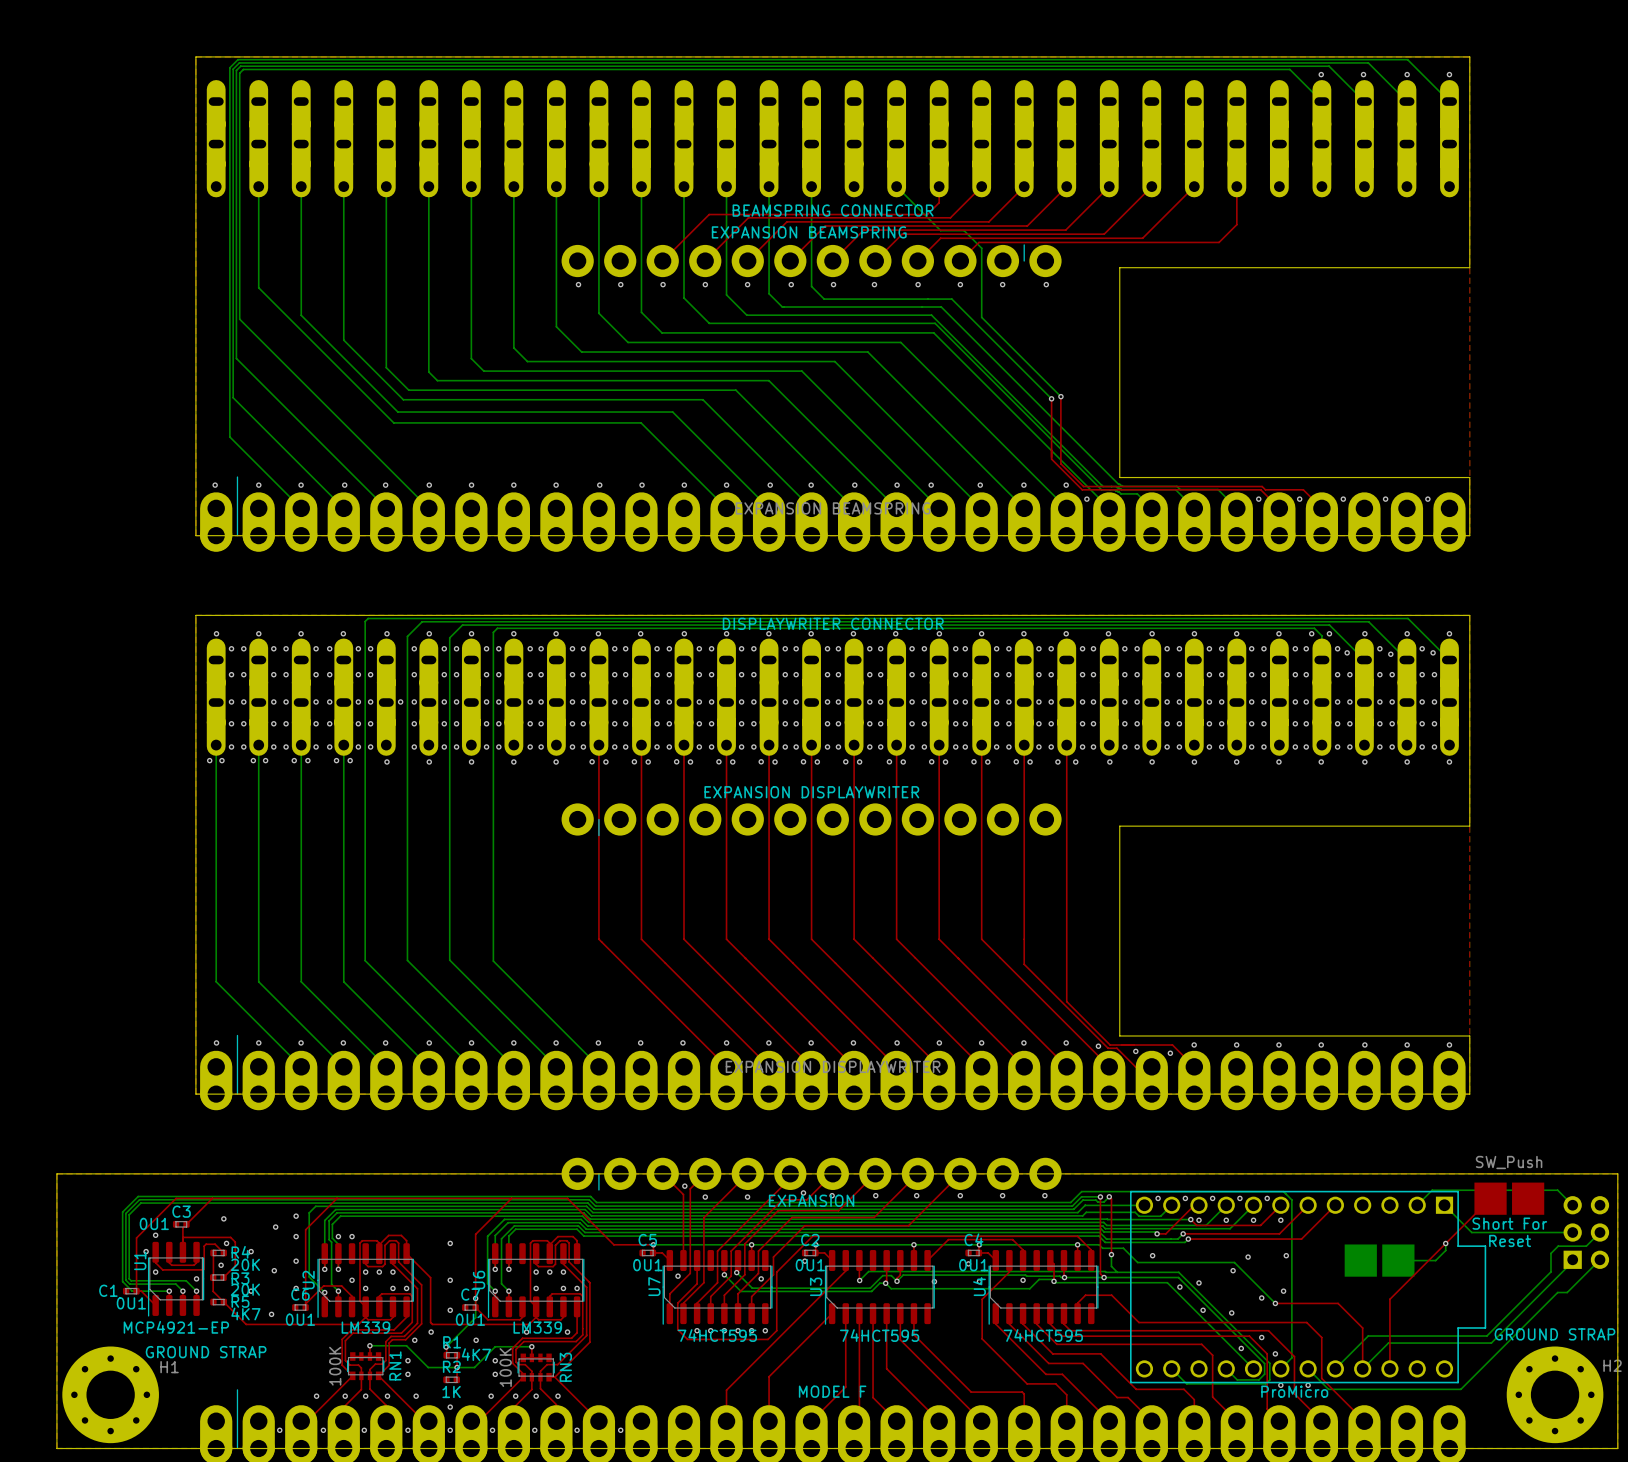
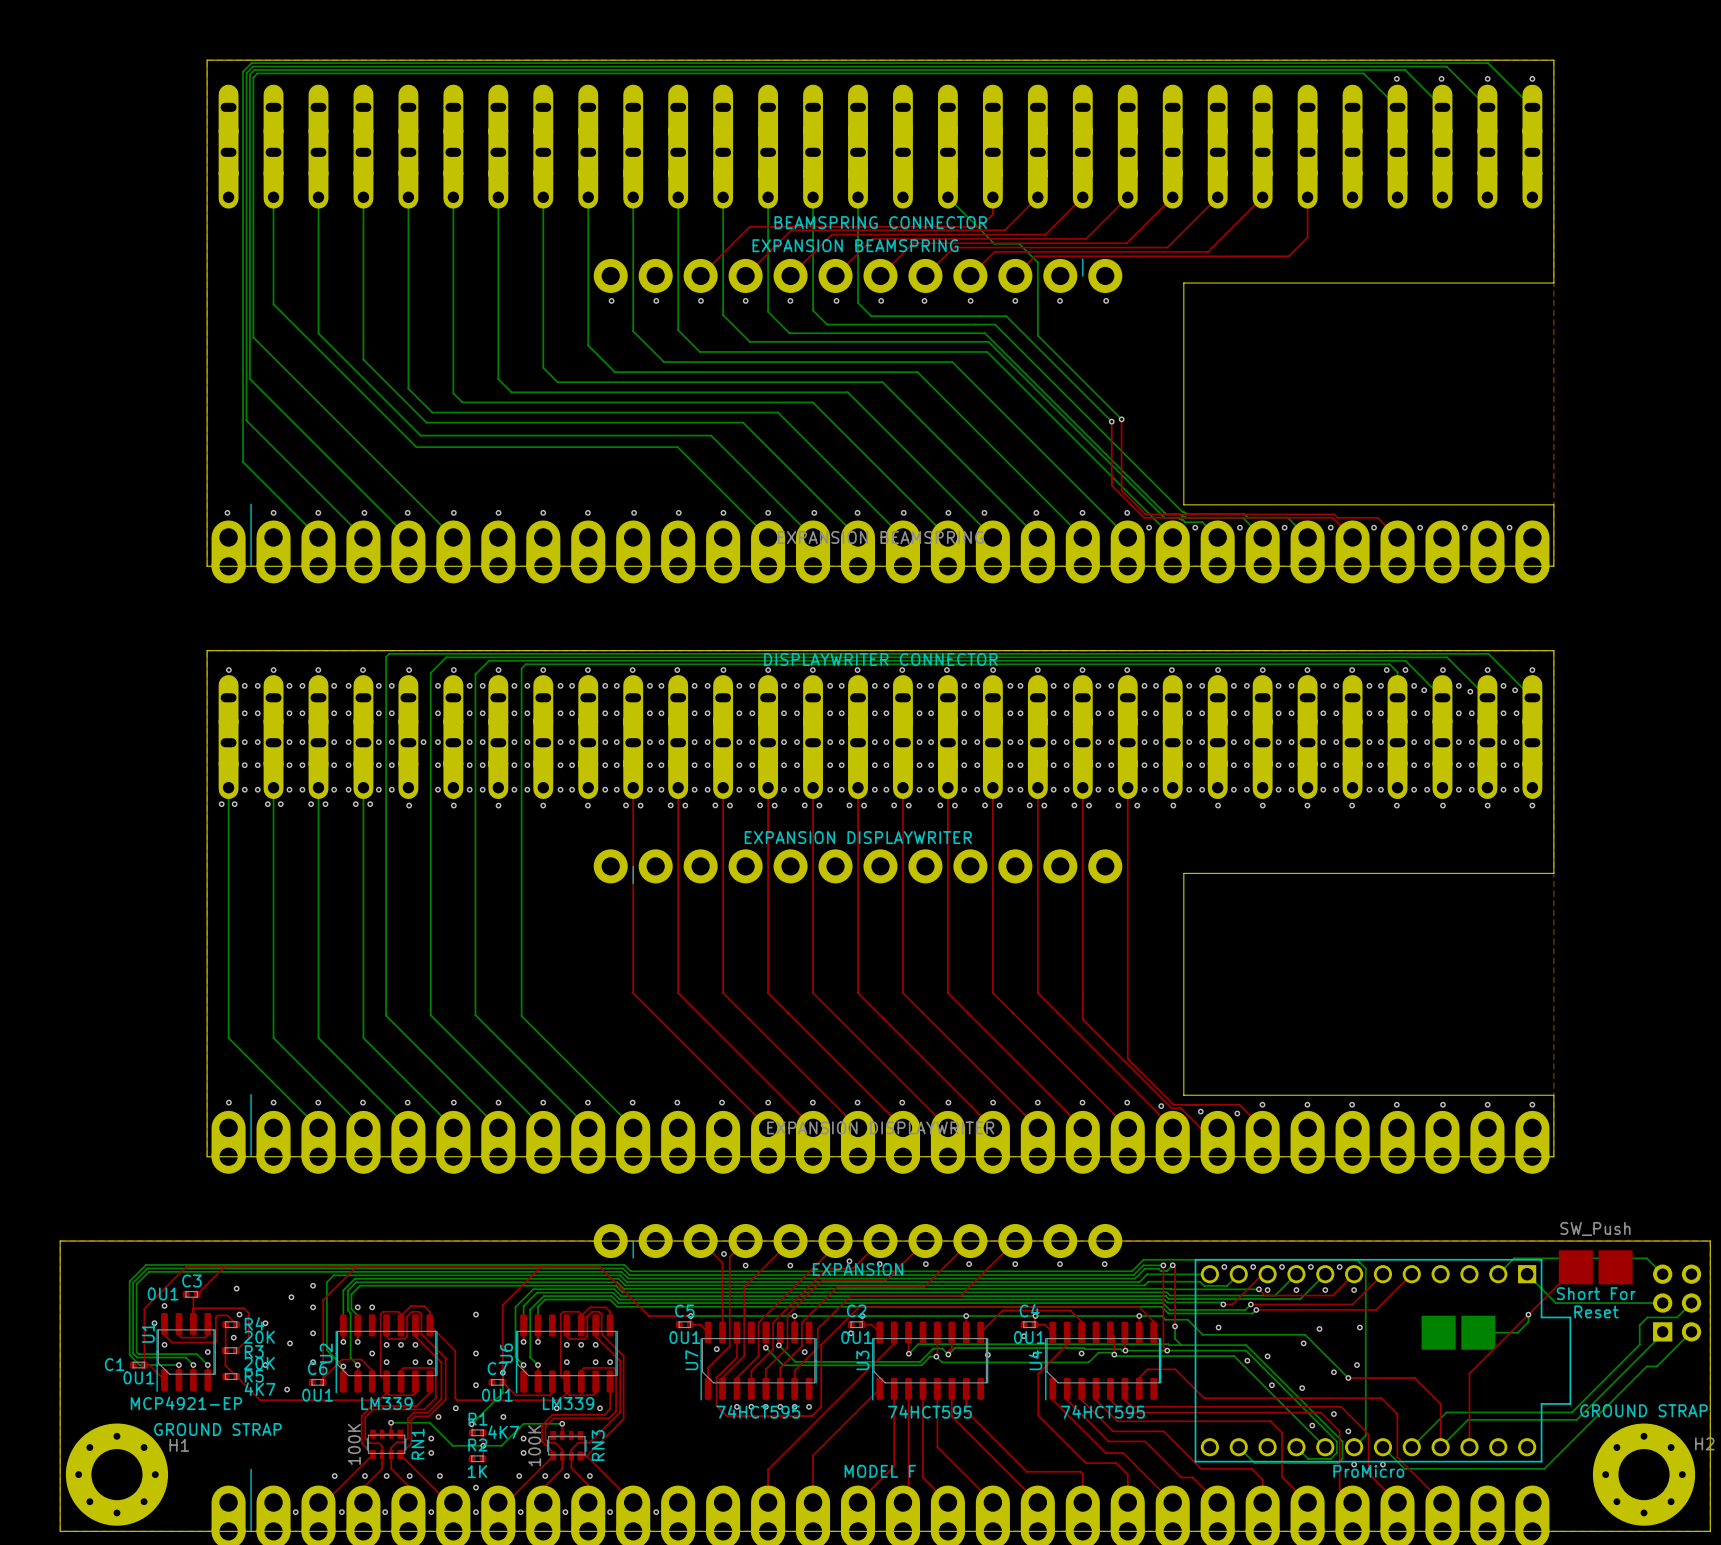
via: none -> (1195, 527)
via: none -> (1239, 527)
via: none -> (1284, 527)

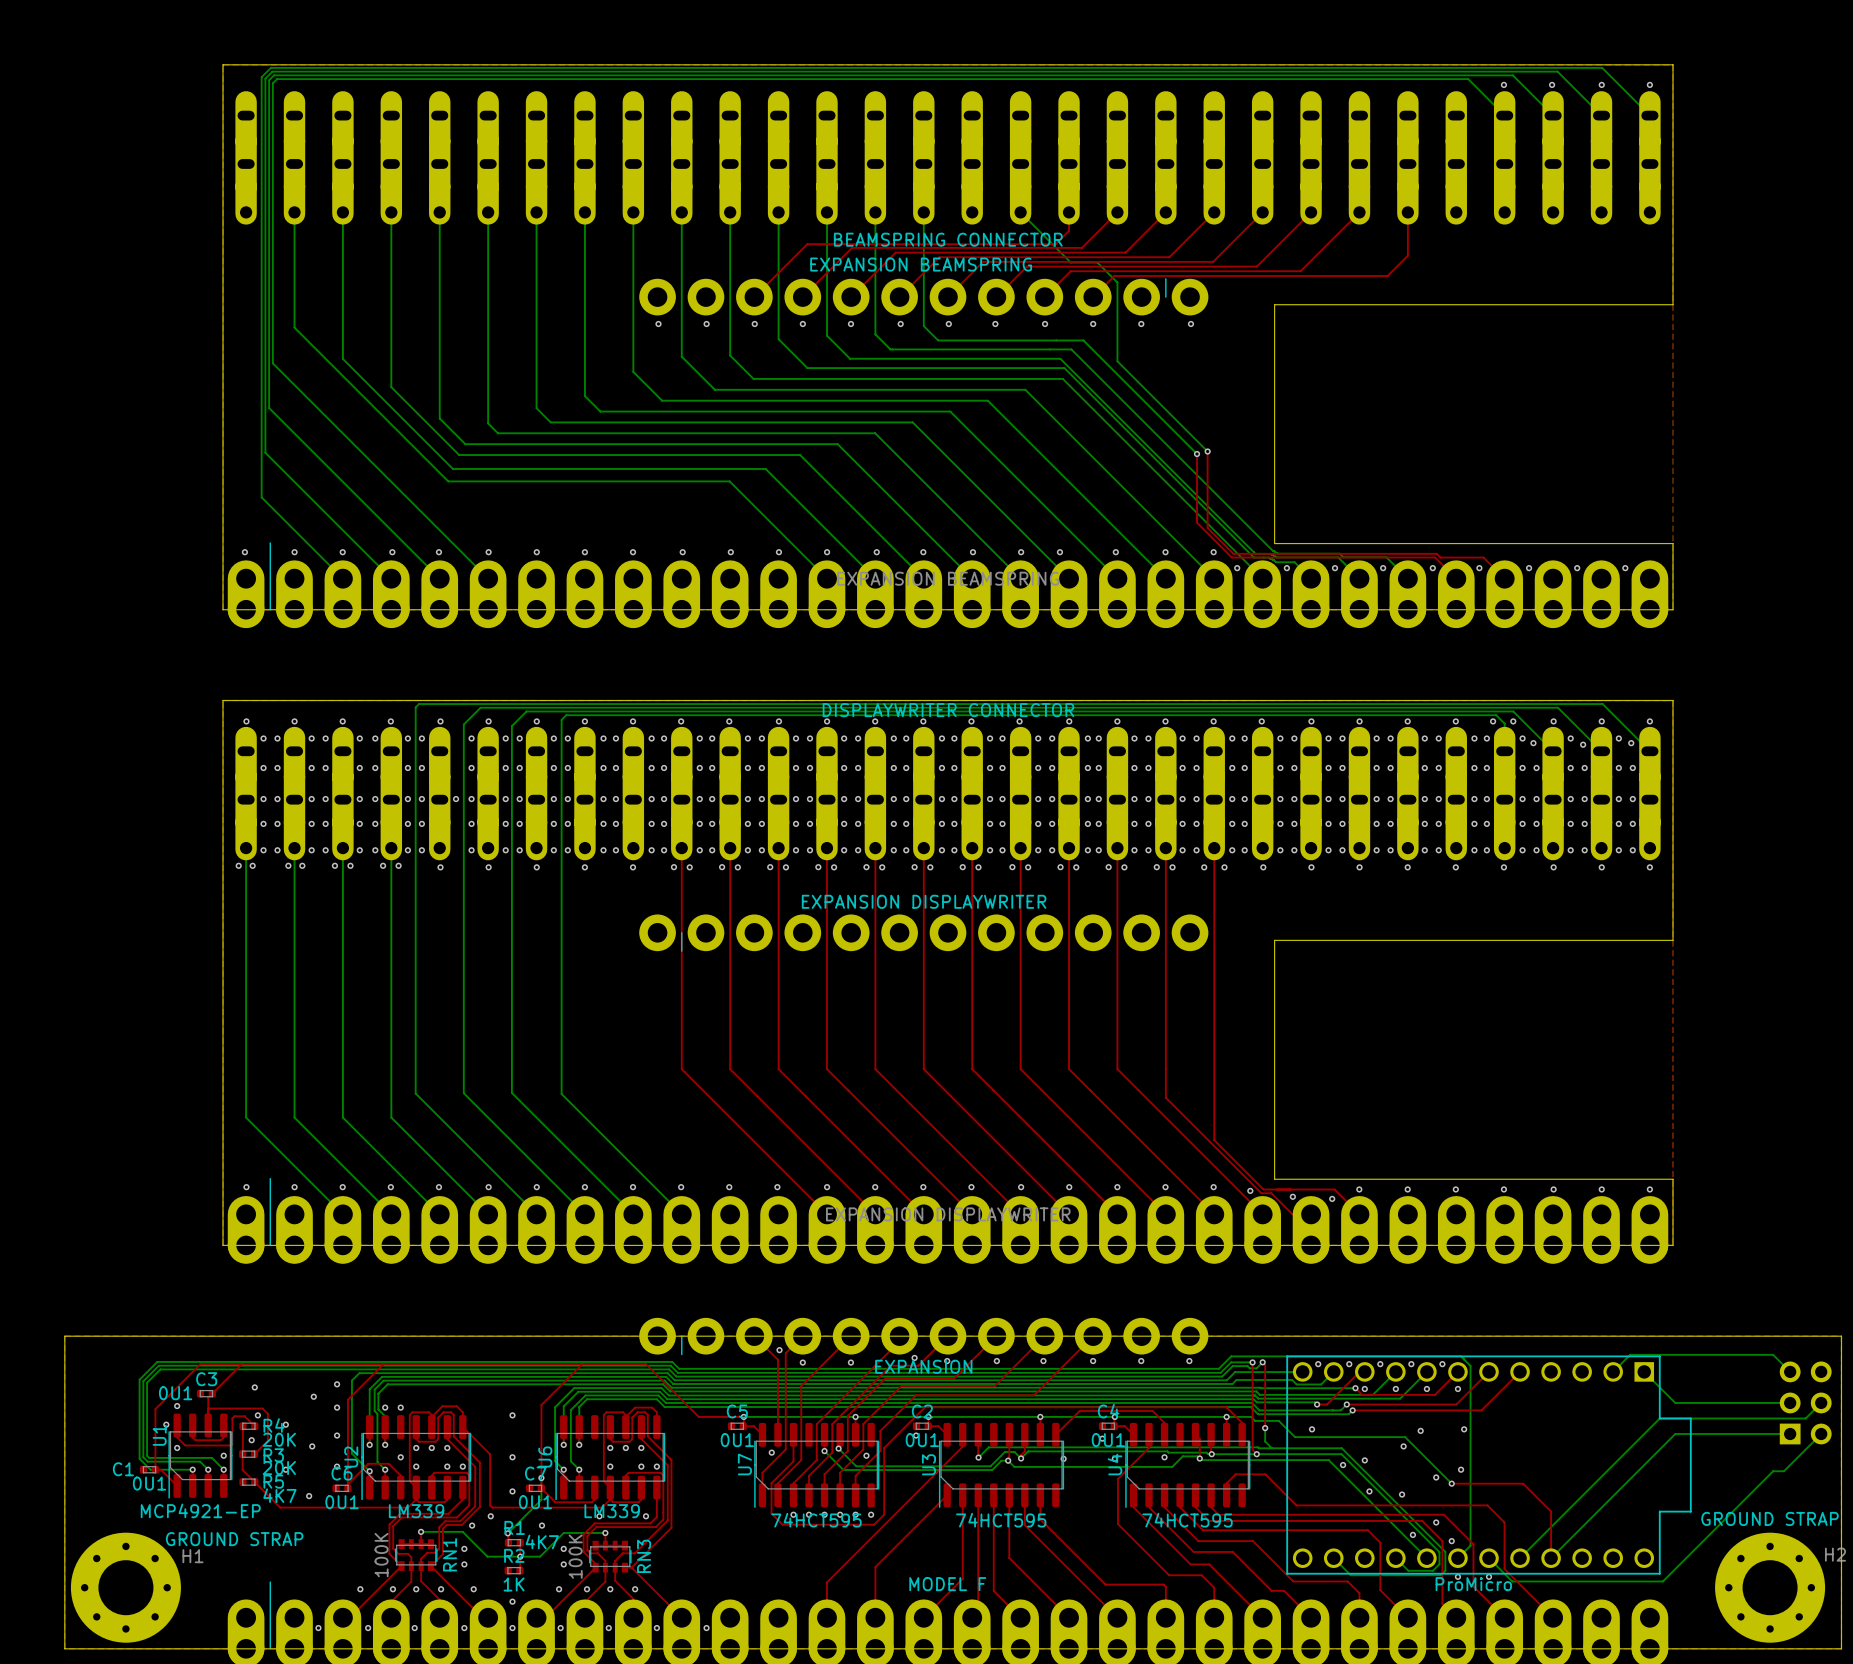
top track: (1575, 1267) (1469, 1373) (1469, 1447) -> none
part: SW_Push (1595, 1267) -> none
text: Short For (1596, 1293) -> none
text: Reset (1596, 1311) -> none
bottom track: (1528, 1314) (1528, 1322) (1517, 1332) (1478, 1332) -> none
via: (1528, 1314) -> none
bottom track: (1647, 1317) (1639, 1325) (1639, 1344) (1571, 1412) (1446, 1412) -> (1773, 1418) (1659, 1418) (1557, 1520)
bottom track: (1662, 1331) (1576, 1419) (1467, 1419) -> (1790, 1434) (1675, 1434) (1580, 1528)
part: (1458, 1332) -> none

